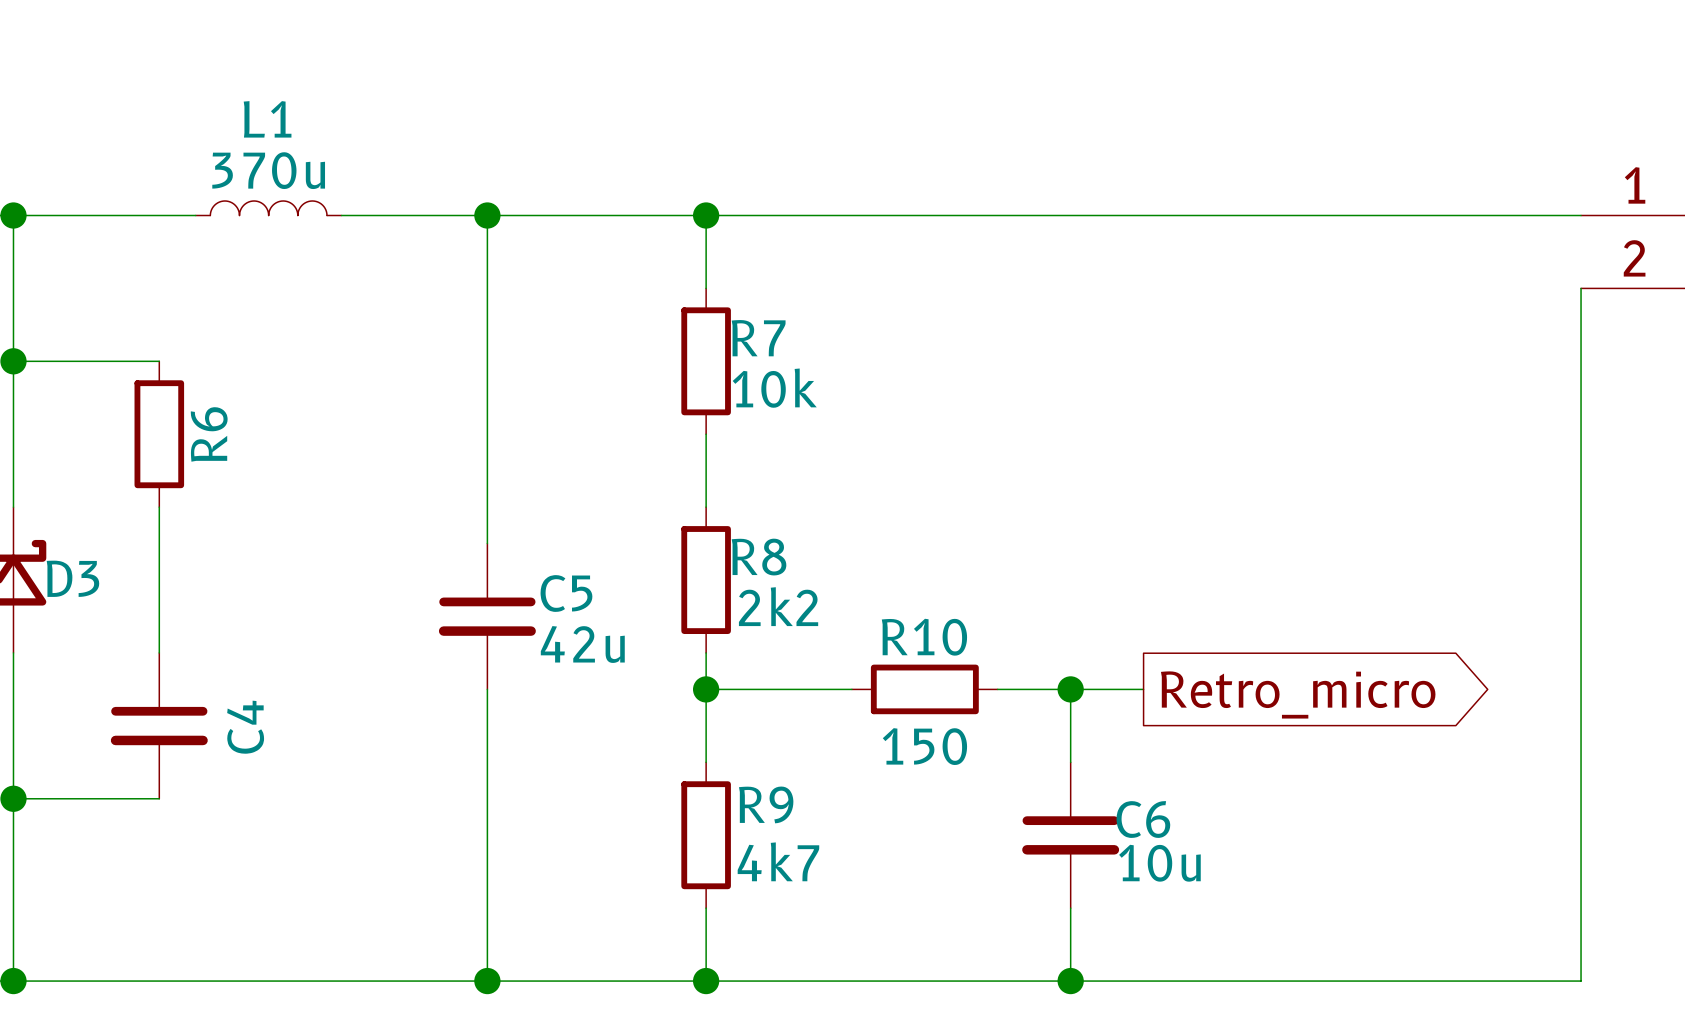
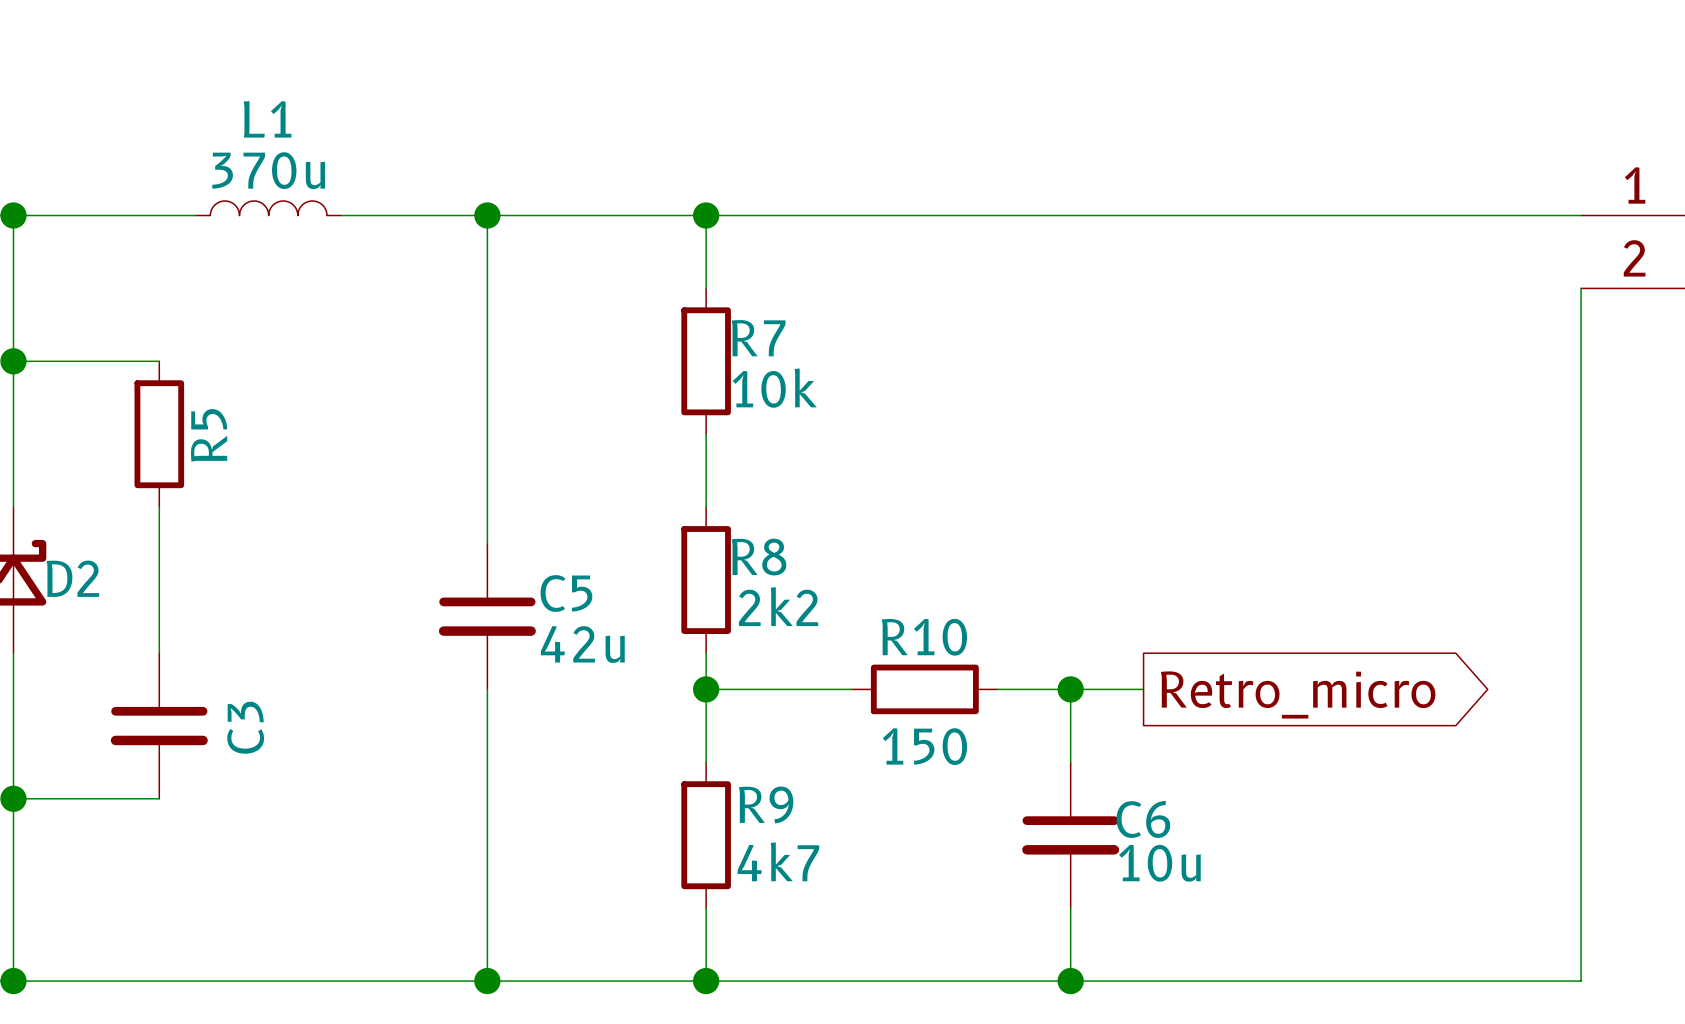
R6 name: R6 (209, 434) -> R5 (209, 435)
D3 name: D3 (72, 578) -> D2 (72, 578)
C4 name: C4 (245, 727) -> C3 (245, 727)

